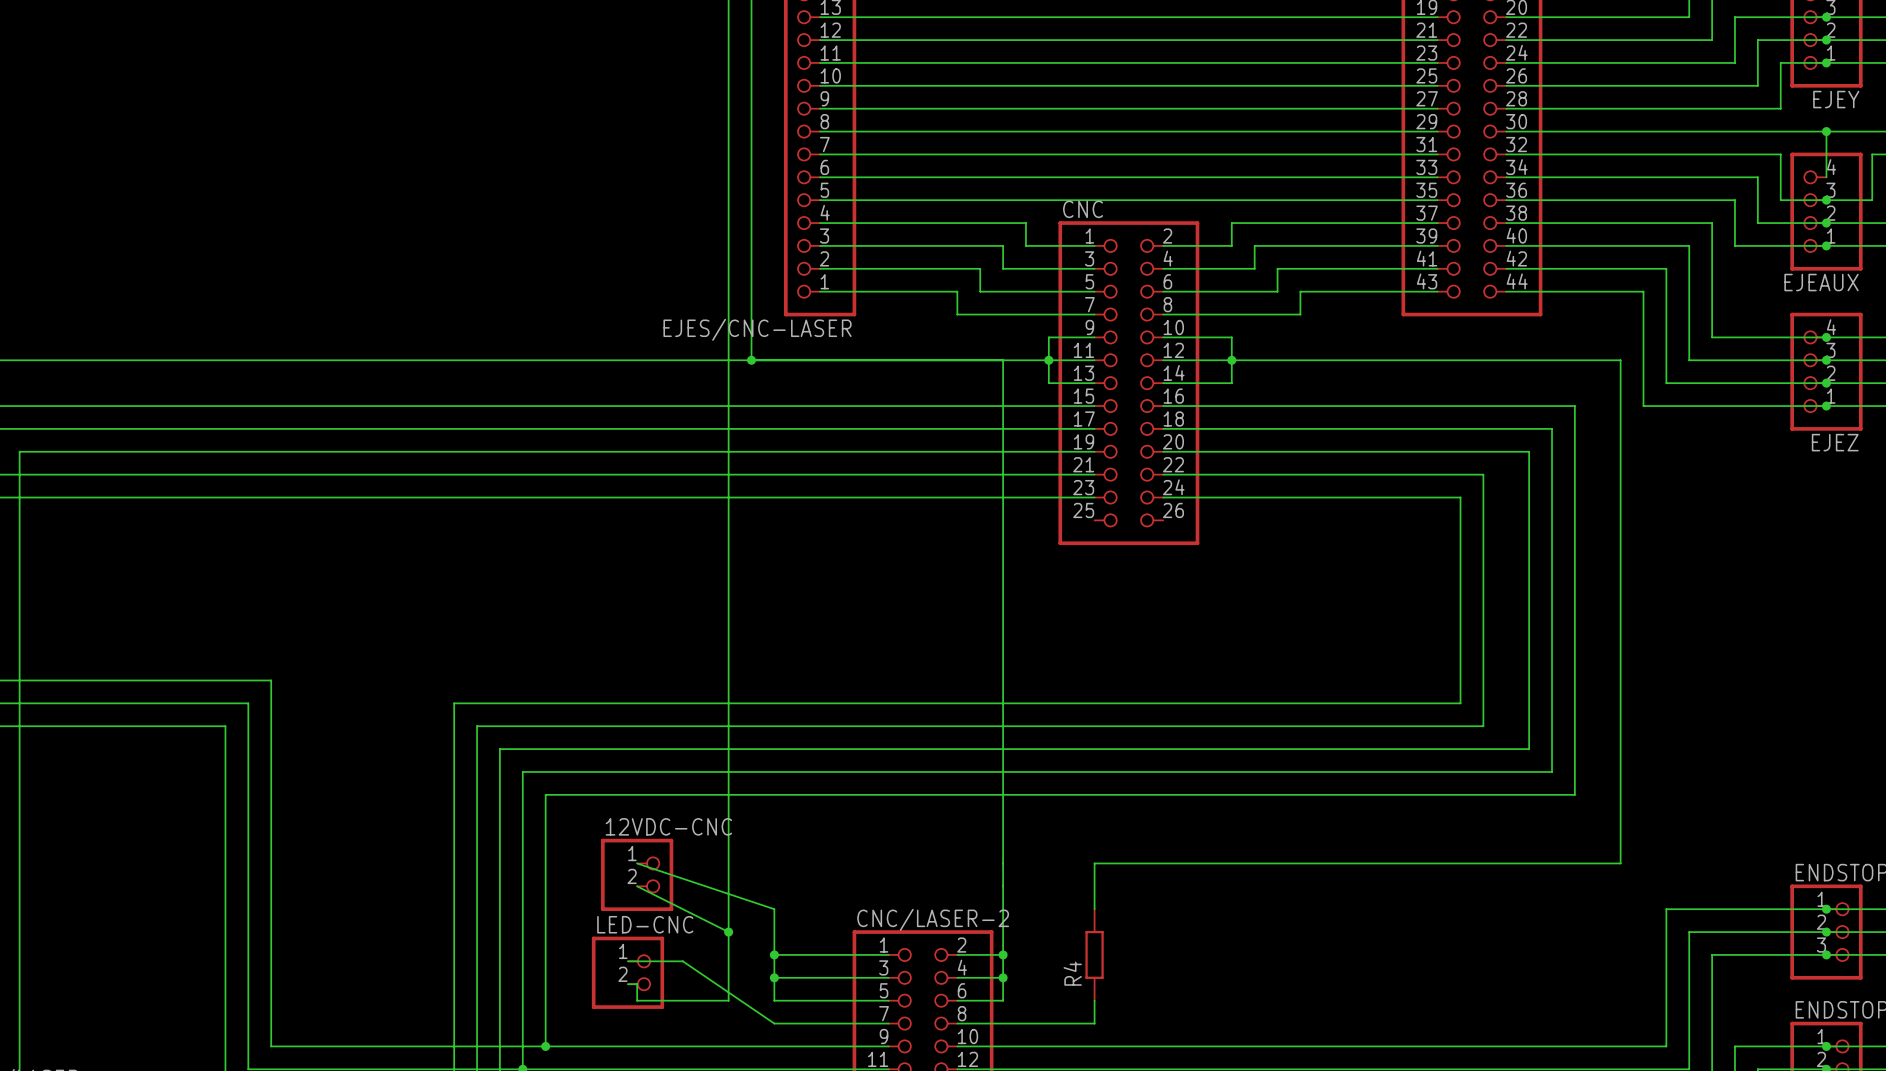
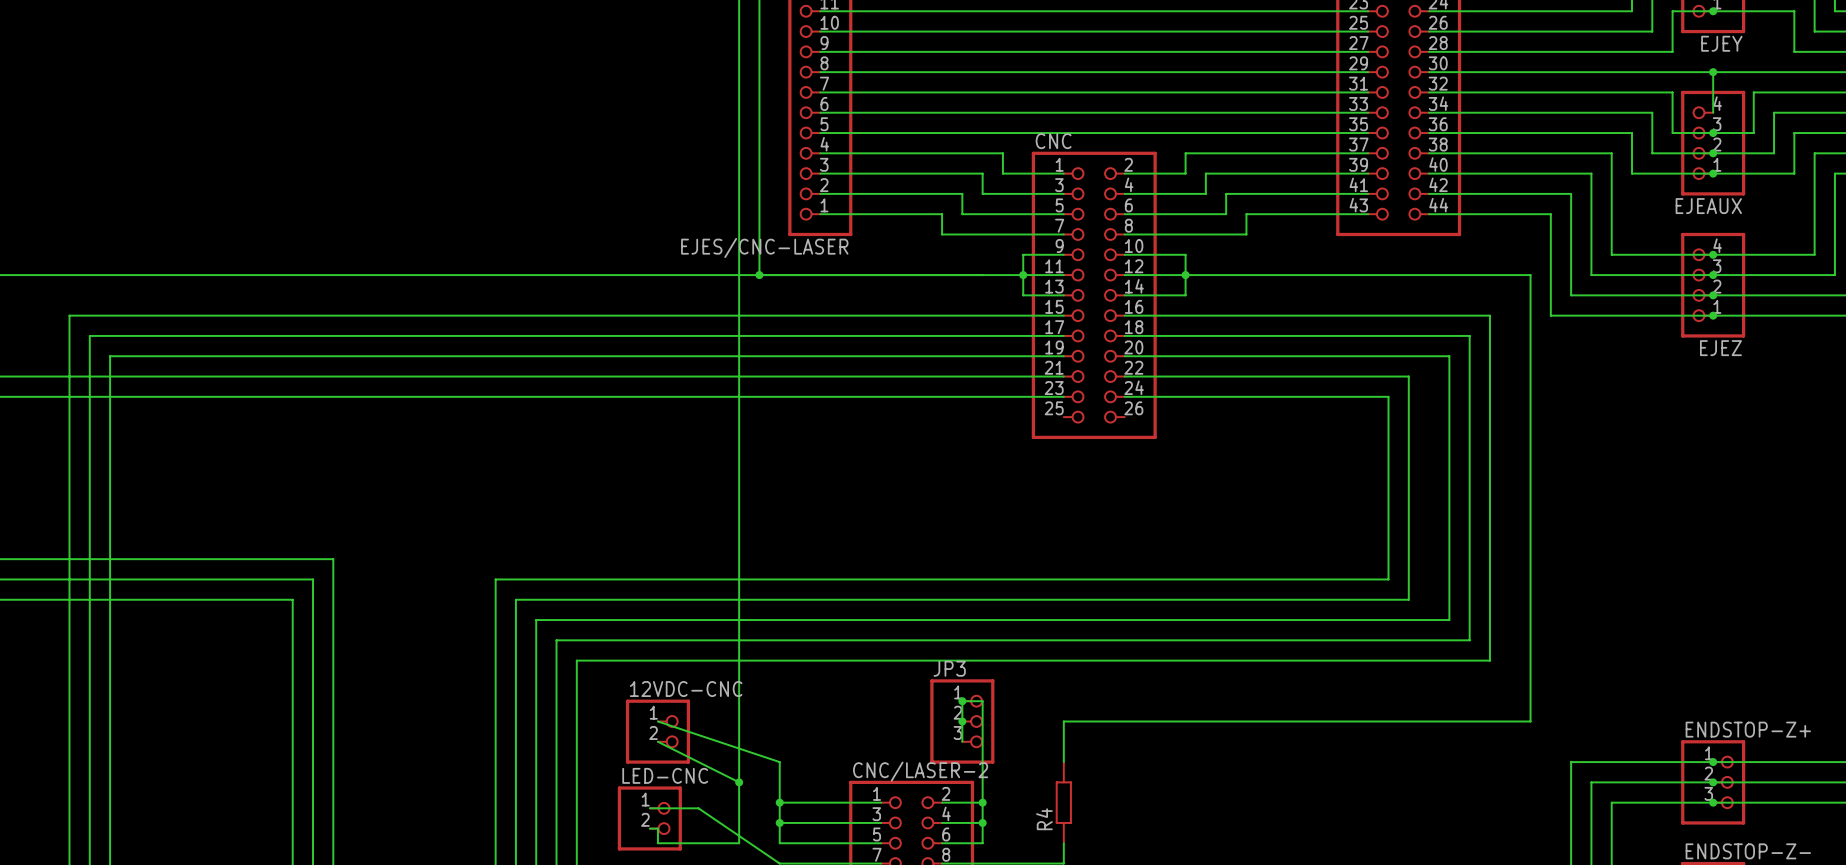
wire: (1003, 360) (1003, 840) -> (962, 741) (962, 701) (982, 701)
junction: none -> (962, 701)
JP3: none -> (962, 721)
junction: none -> (962, 721)

